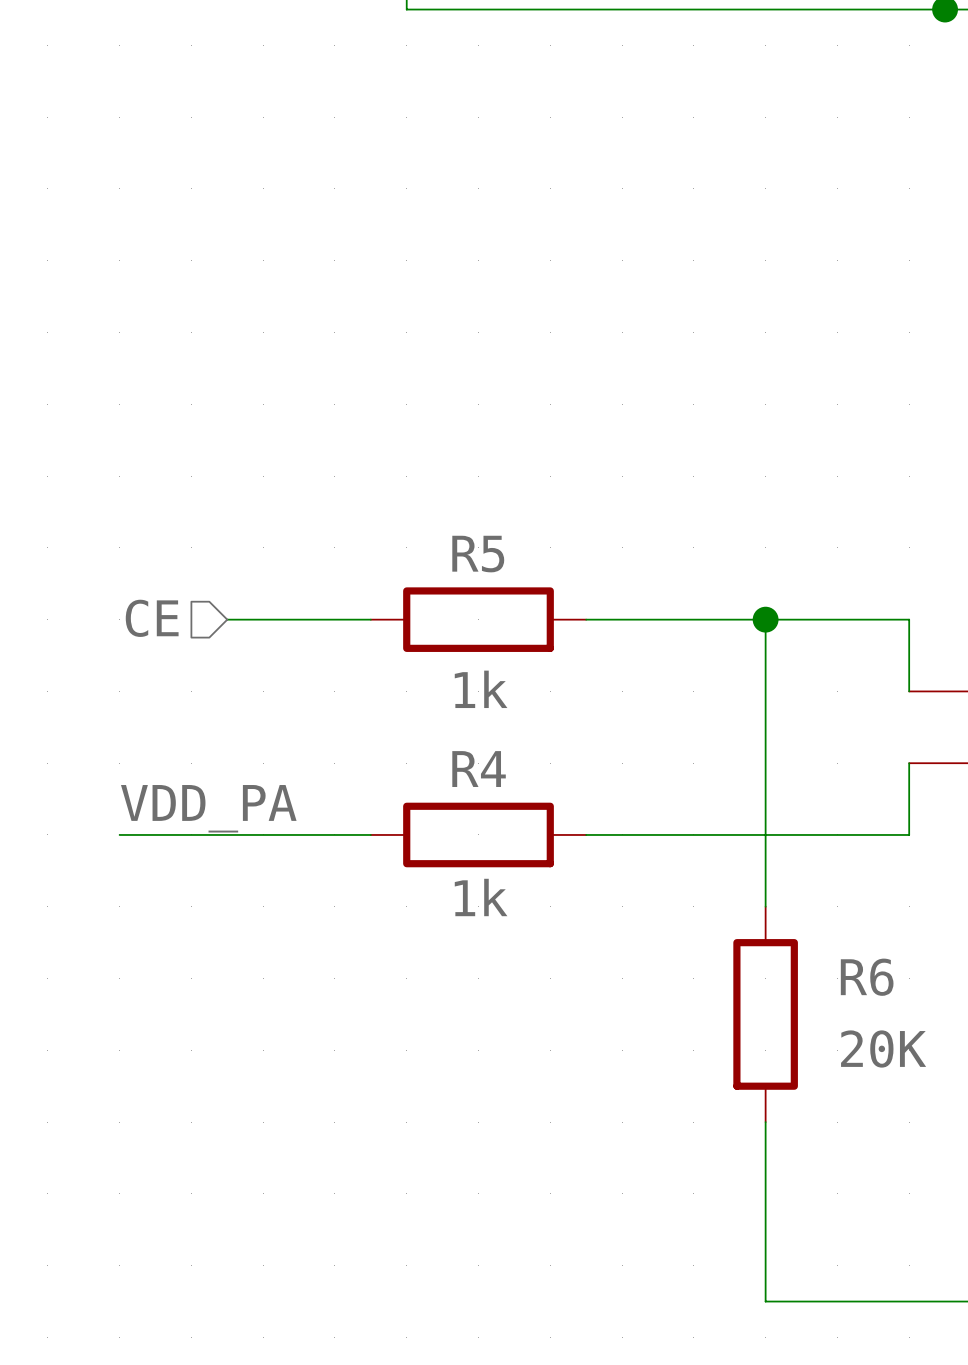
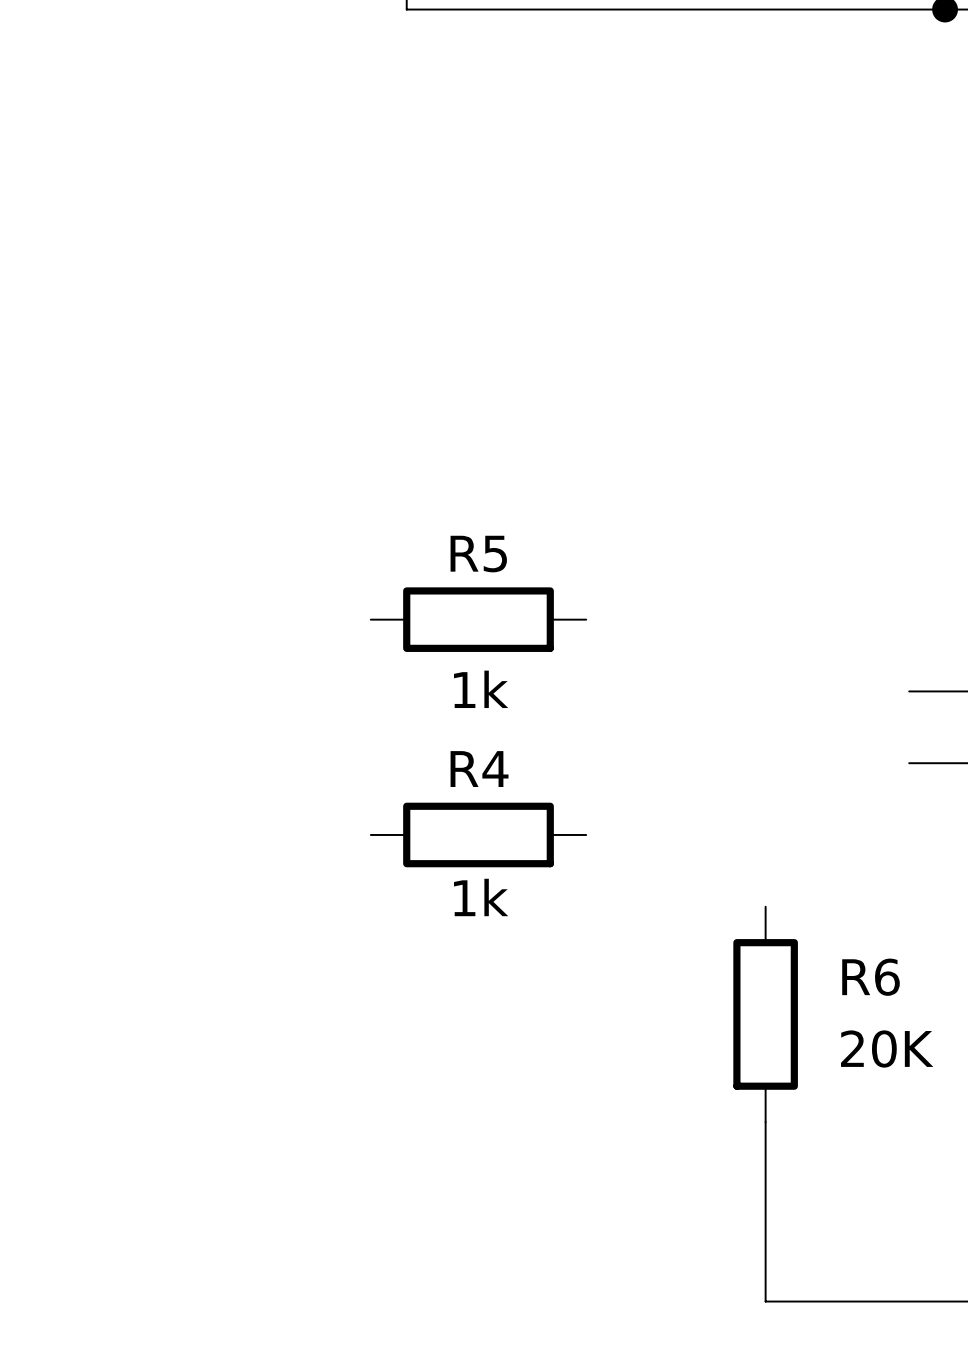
hierarchical label: CE (152, 618) -> none
wire: (227, 619) (370, 619) -> none
wire: (586, 619) (909, 619) (909, 691) -> none
wire: (765, 619) (765, 906) -> none
junction: (765, 619) -> none
wire: (909, 763) (909, 834) (586, 834) -> none
label: VDD_PA (208, 808) -> none
wire: (119, 834) (370, 834) -> none

